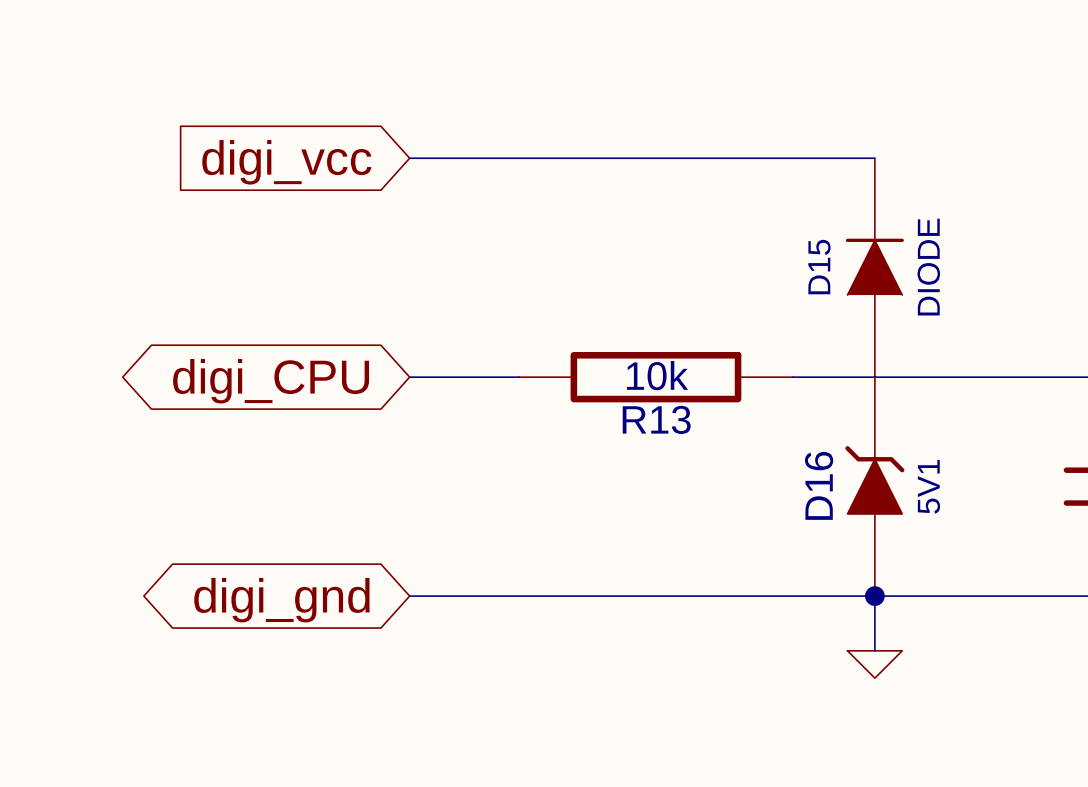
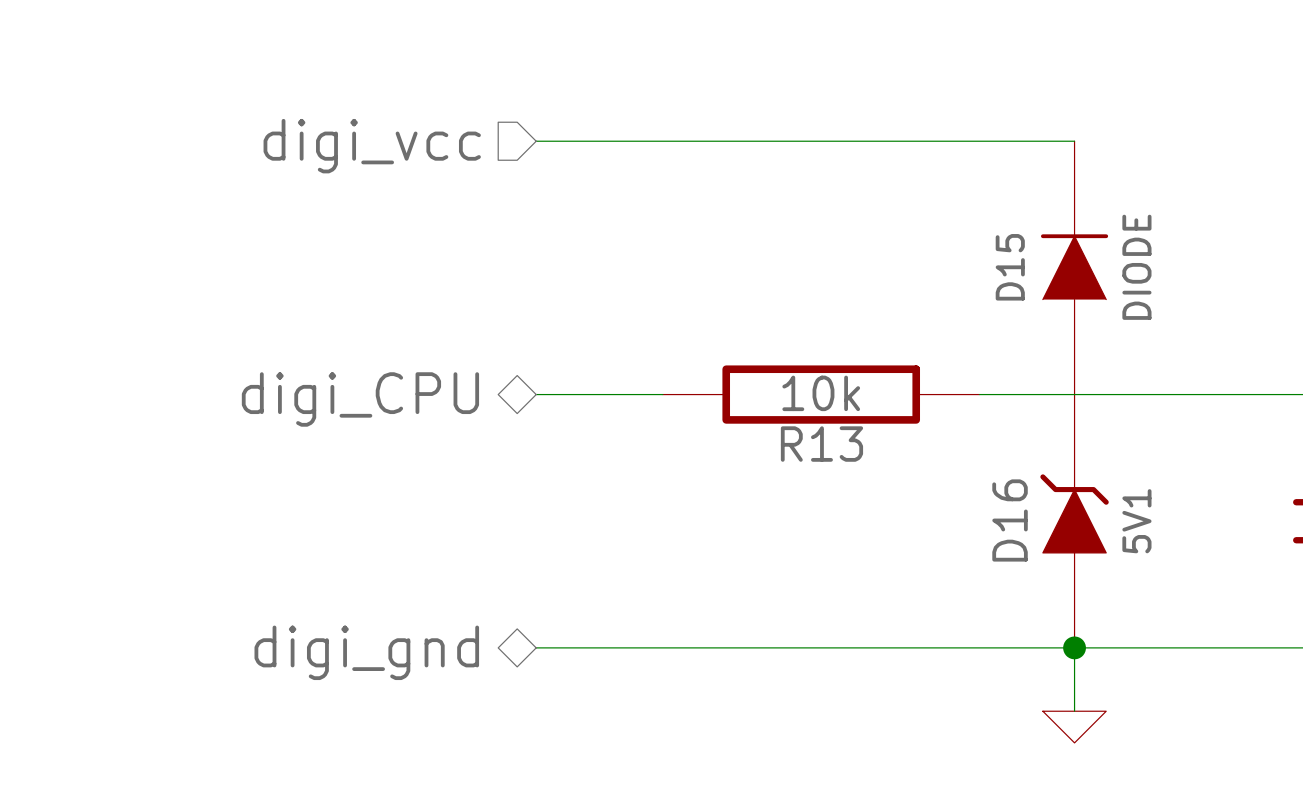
hierarchical label: none -> digi_vcc (372, 146)
global label: digi_vcc (286, 162) -> none
hierarchical label: none -> digi_CPU (360, 399)
global label: digi_CPU (271, 381) -> none
hierarchical label: none -> digi_gnd (366, 652)
global label: digi_gnd (281, 600) -> none

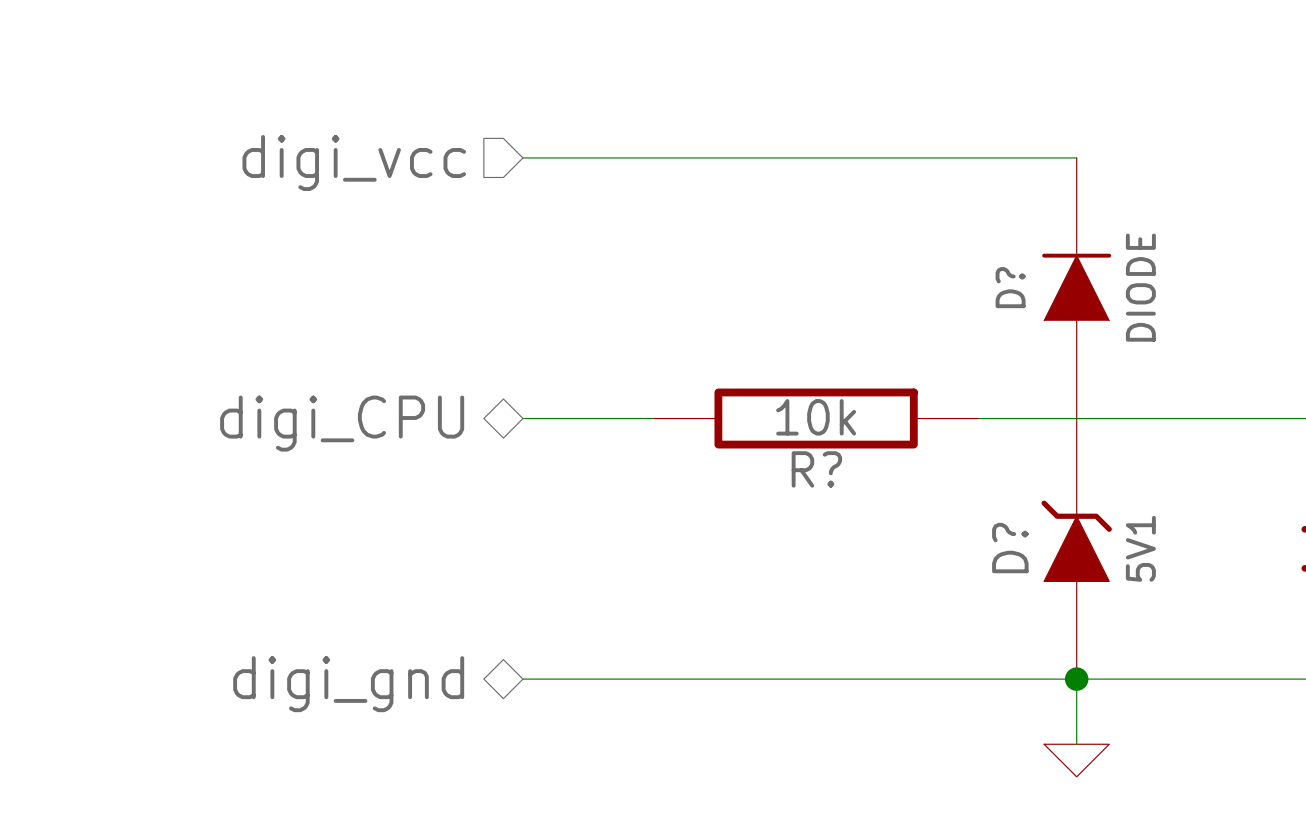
D15 name: D15 (1010, 267) -> D? (1010, 287)
R13 name: R13 (821, 444) -> R? (816, 469)
D16 name: D16 (1010, 520) -> D? (1010, 548)

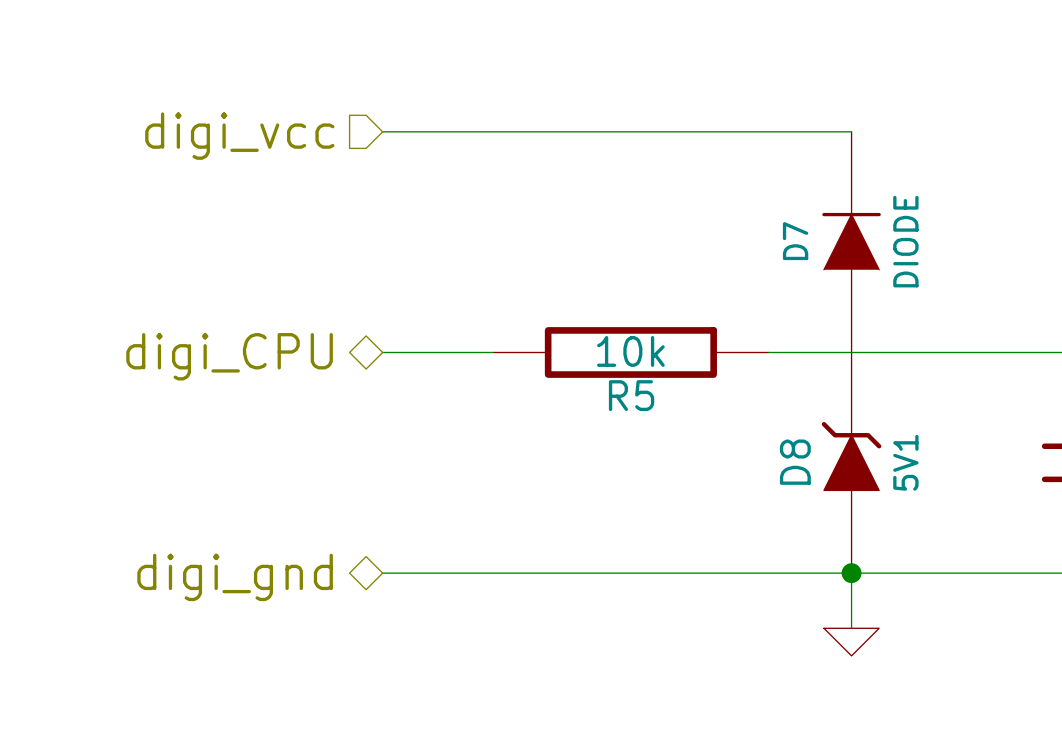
D? name: D? (1010, 287) -> D7 (795, 241)
R? name: R? (816, 469) -> R5 (631, 395)
D? name: D? (1010, 548) -> D8 (795, 462)

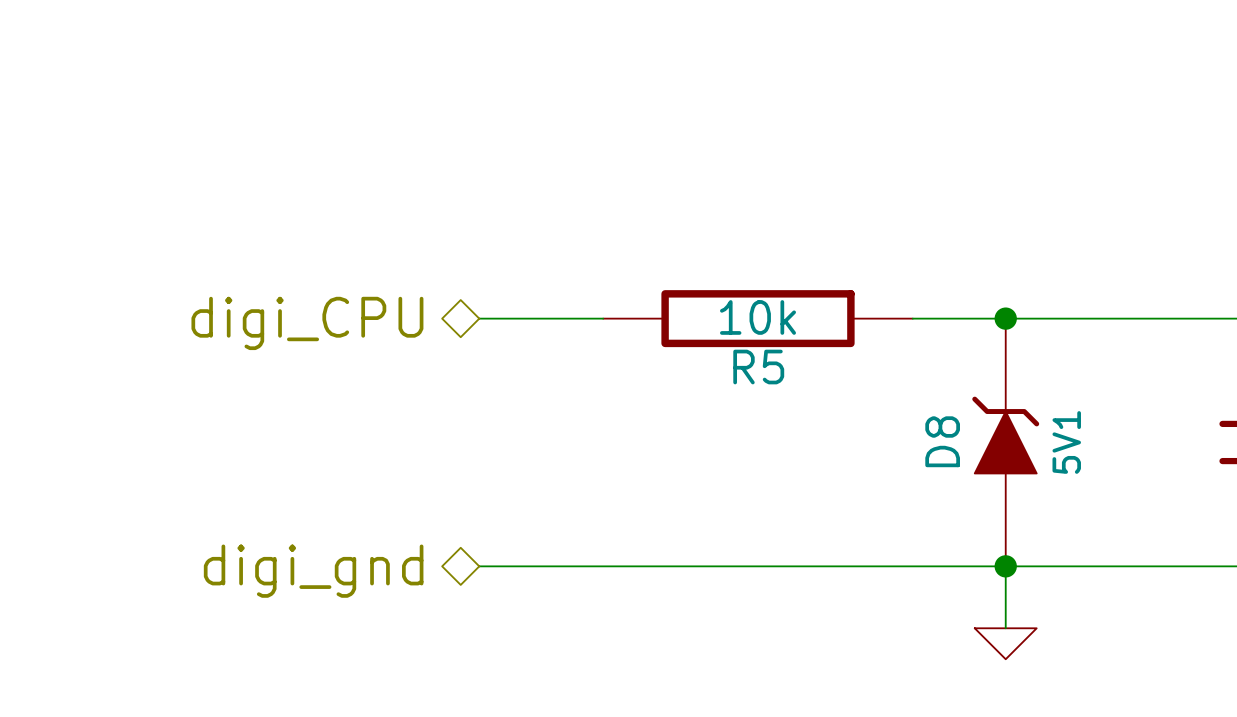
wire: (382, 131) (851, 131) -> none
hierarchical label: digi_vcc (239, 136) -> none
D7: DIODE (851, 242) -> none
junction: none -> (1005, 318)

